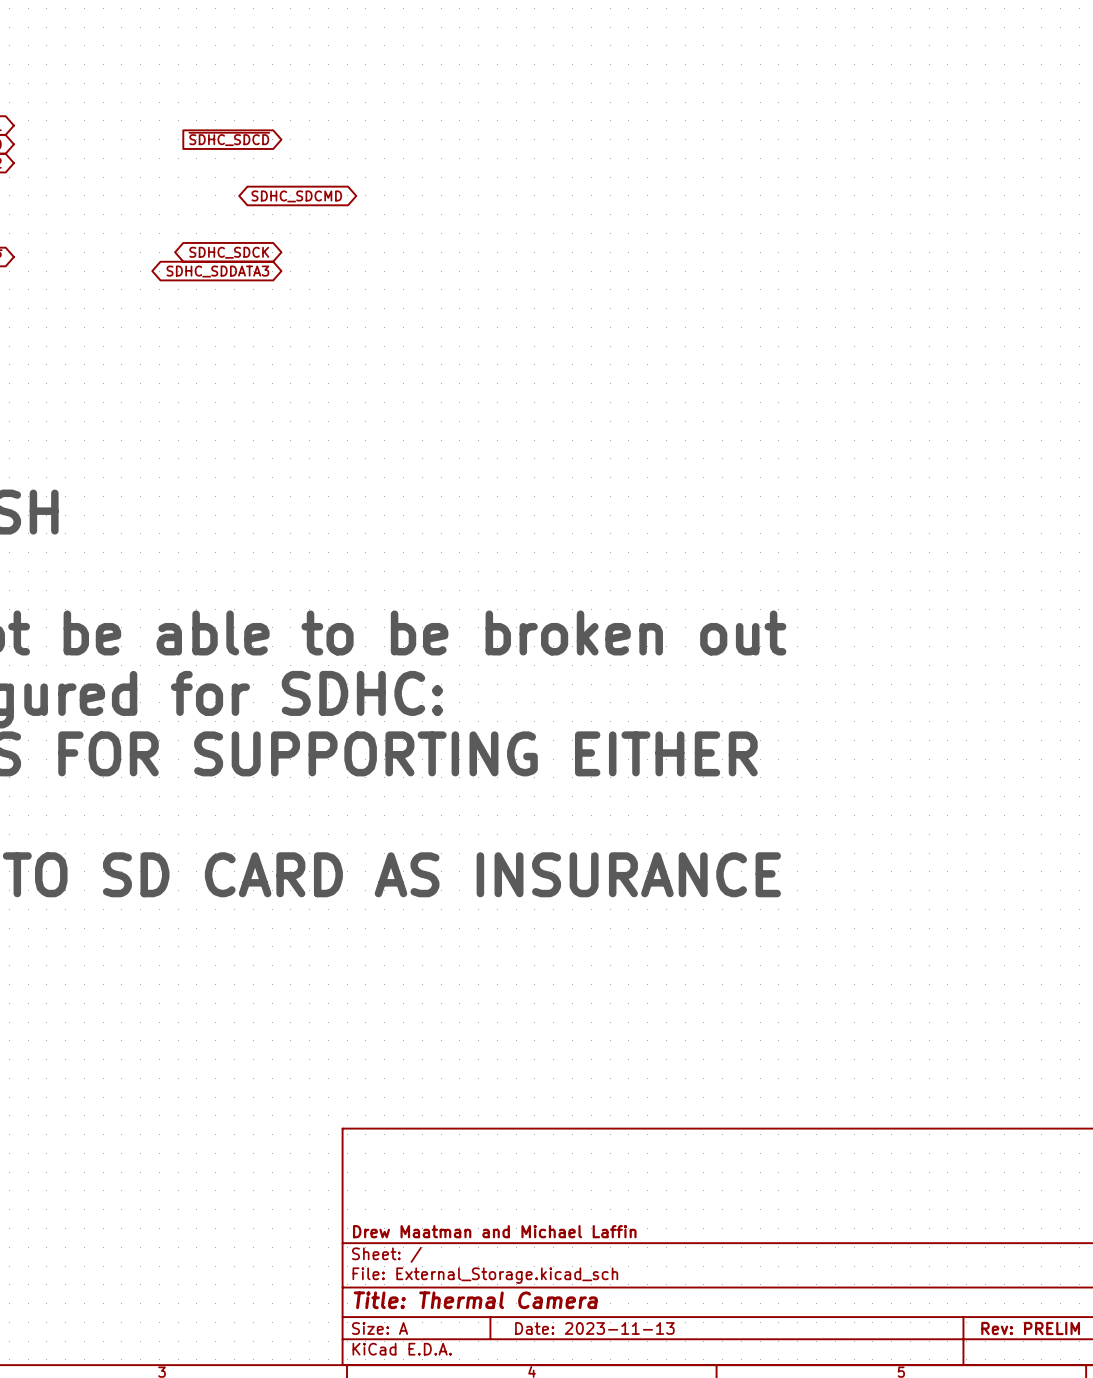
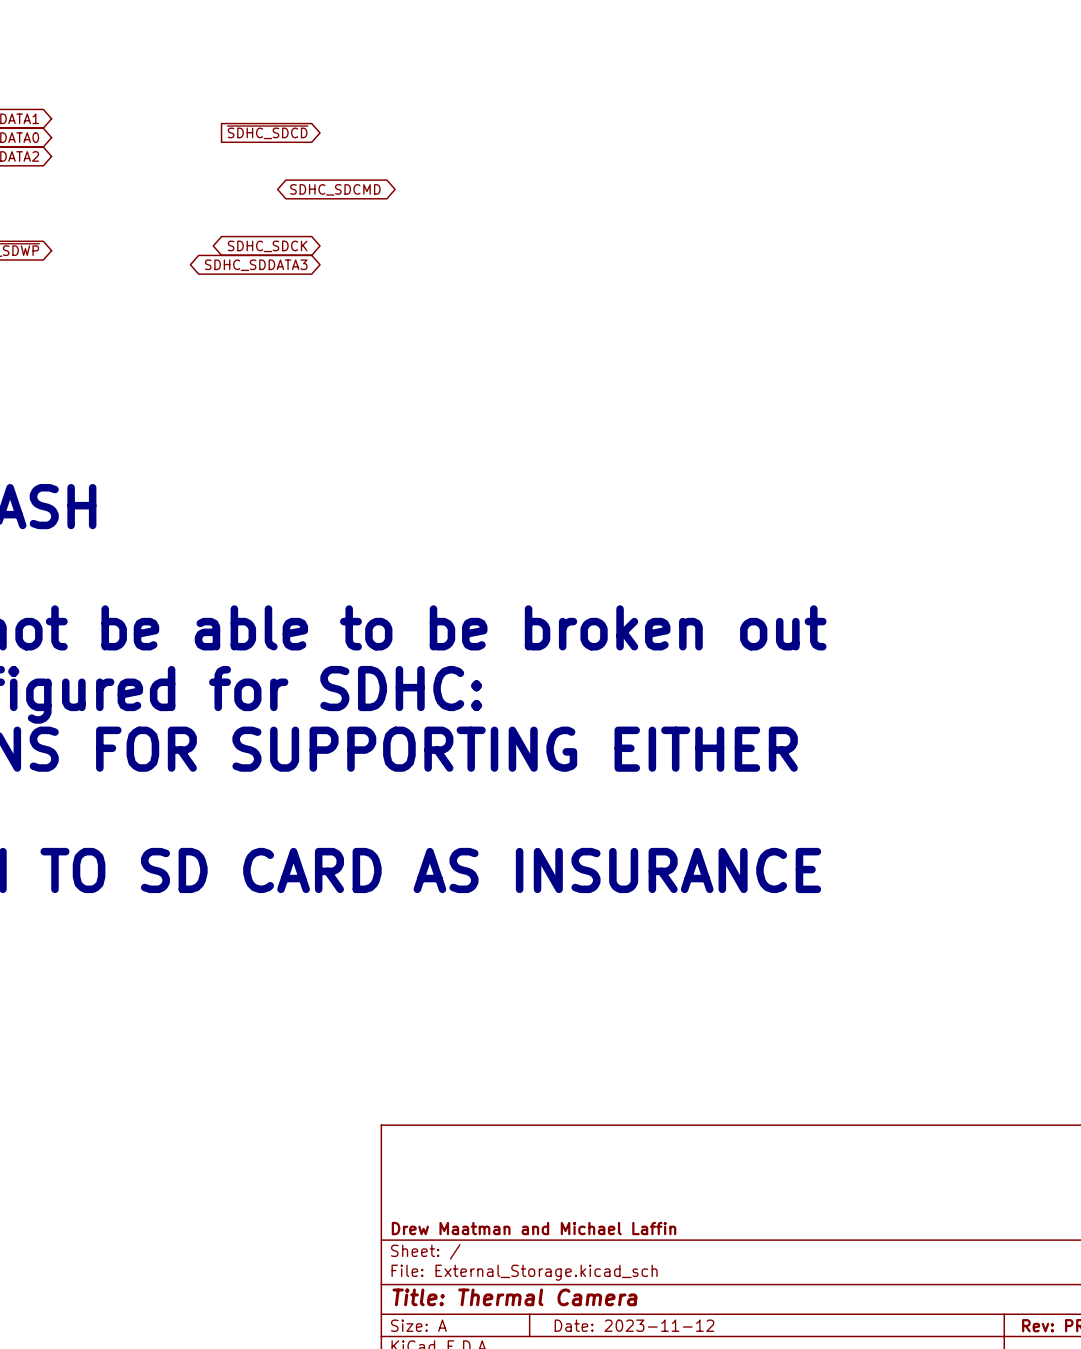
title block: Date: 2023-11-13 (594, 1328) -> Date: 2023-11-12 (634, 1325)

